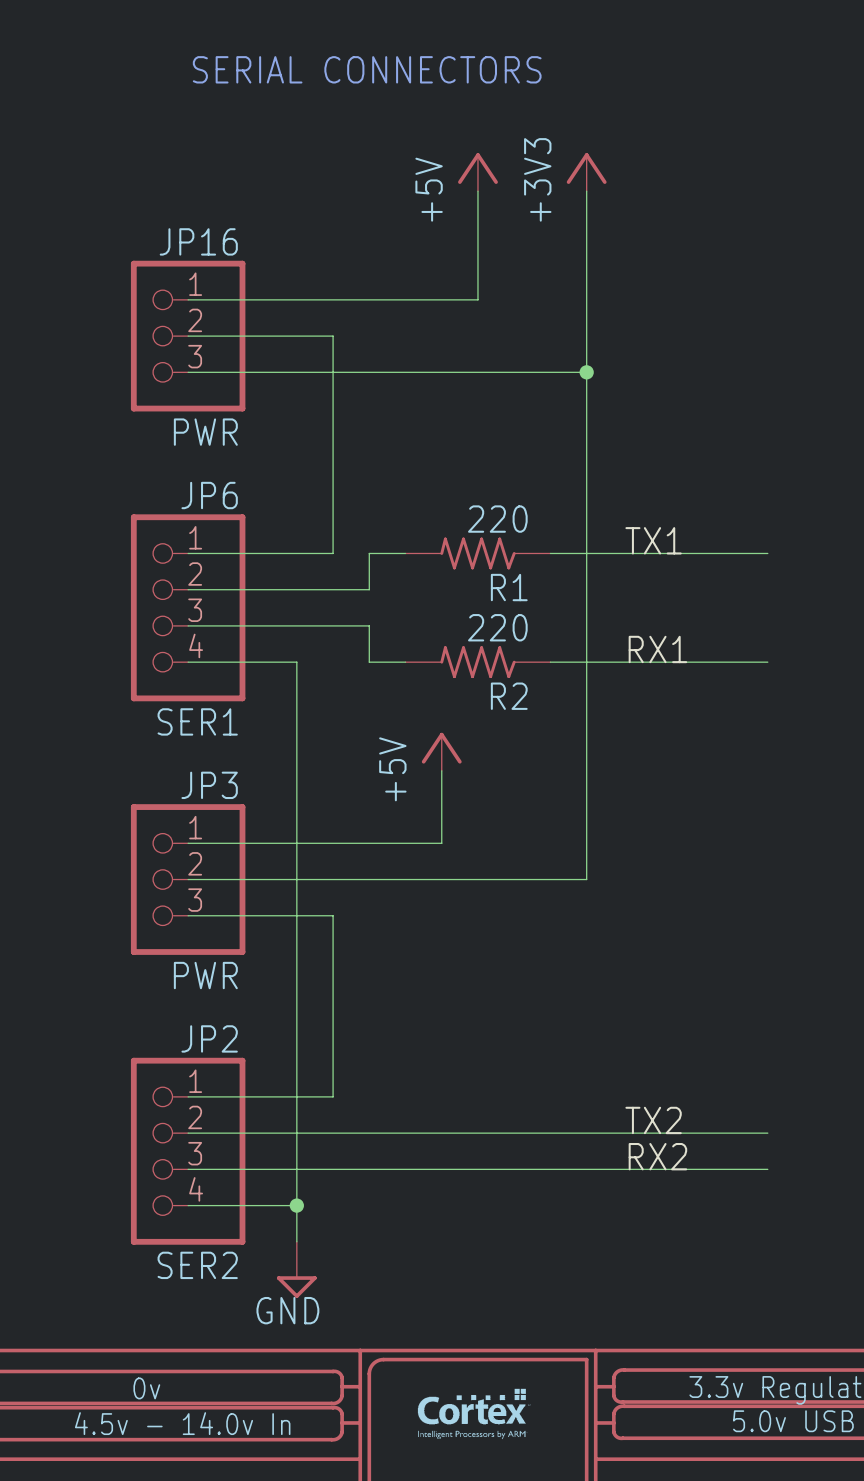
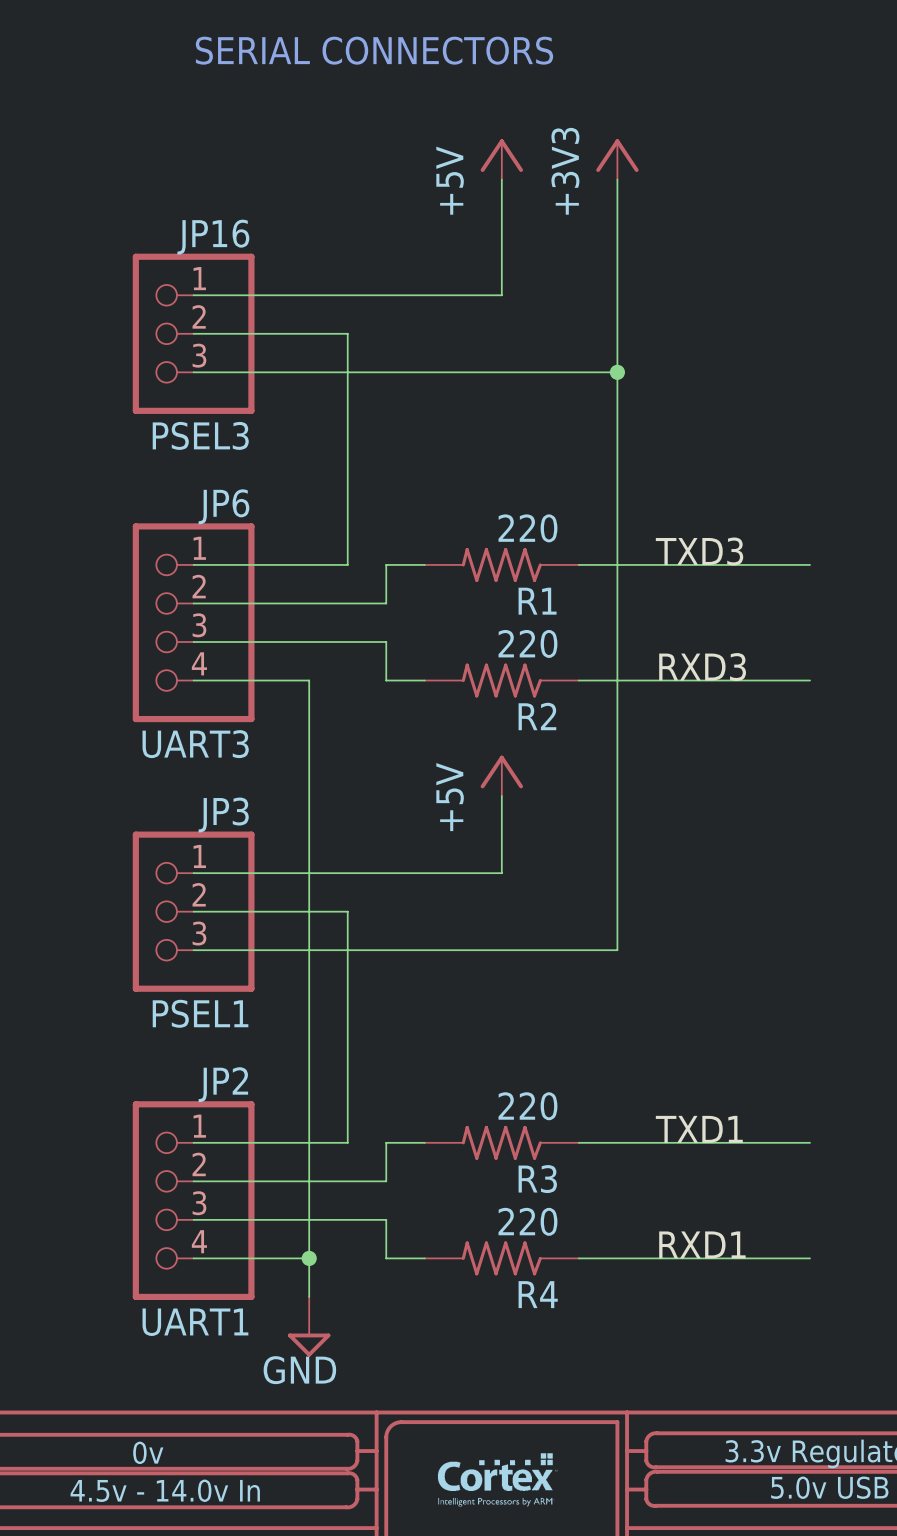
JP16 value: PWR (205, 432) -> PSEL3 (200, 435)
label: TX1 (653, 540) -> TXD3 (699, 551)
label: RX1 (657, 649) -> RXD3 (702, 667)
JP6 value: SER1 (197, 721) -> UART3 (195, 744)
power symbol position: +5V (441, 751) -> +5V (501, 775)
wire: (441, 770) (441, 843) -> (501, 796) (501, 873) (463, 873)
wire: (333, 879) (586, 879) -> (347, 911) (347, 950) (617, 950) (617, 911)
JP3 value: PWR (205, 975) -> PSEL1 (200, 1013)
label: none -> TXD1 (699, 1129)
R3: none -> 220 (501, 1142)
wire: none -> (578, 1142) (810, 1142)
label: TX2 (653, 1120) -> none
wire: (369, 1133) (767, 1133) -> (386, 1181) (386, 1142) (424, 1142)
label: RX2 (657, 1156) -> none
wire: (369, 1169) (767, 1169) -> (386, 1219) (386, 1258) (424, 1258)
label: none -> RXD1 (702, 1244)
R4: none -> 220 (501, 1258)
wire: none -> (578, 1258) (810, 1258)
JP2 value: SER2 (197, 1265) -> UART1 (195, 1322)

